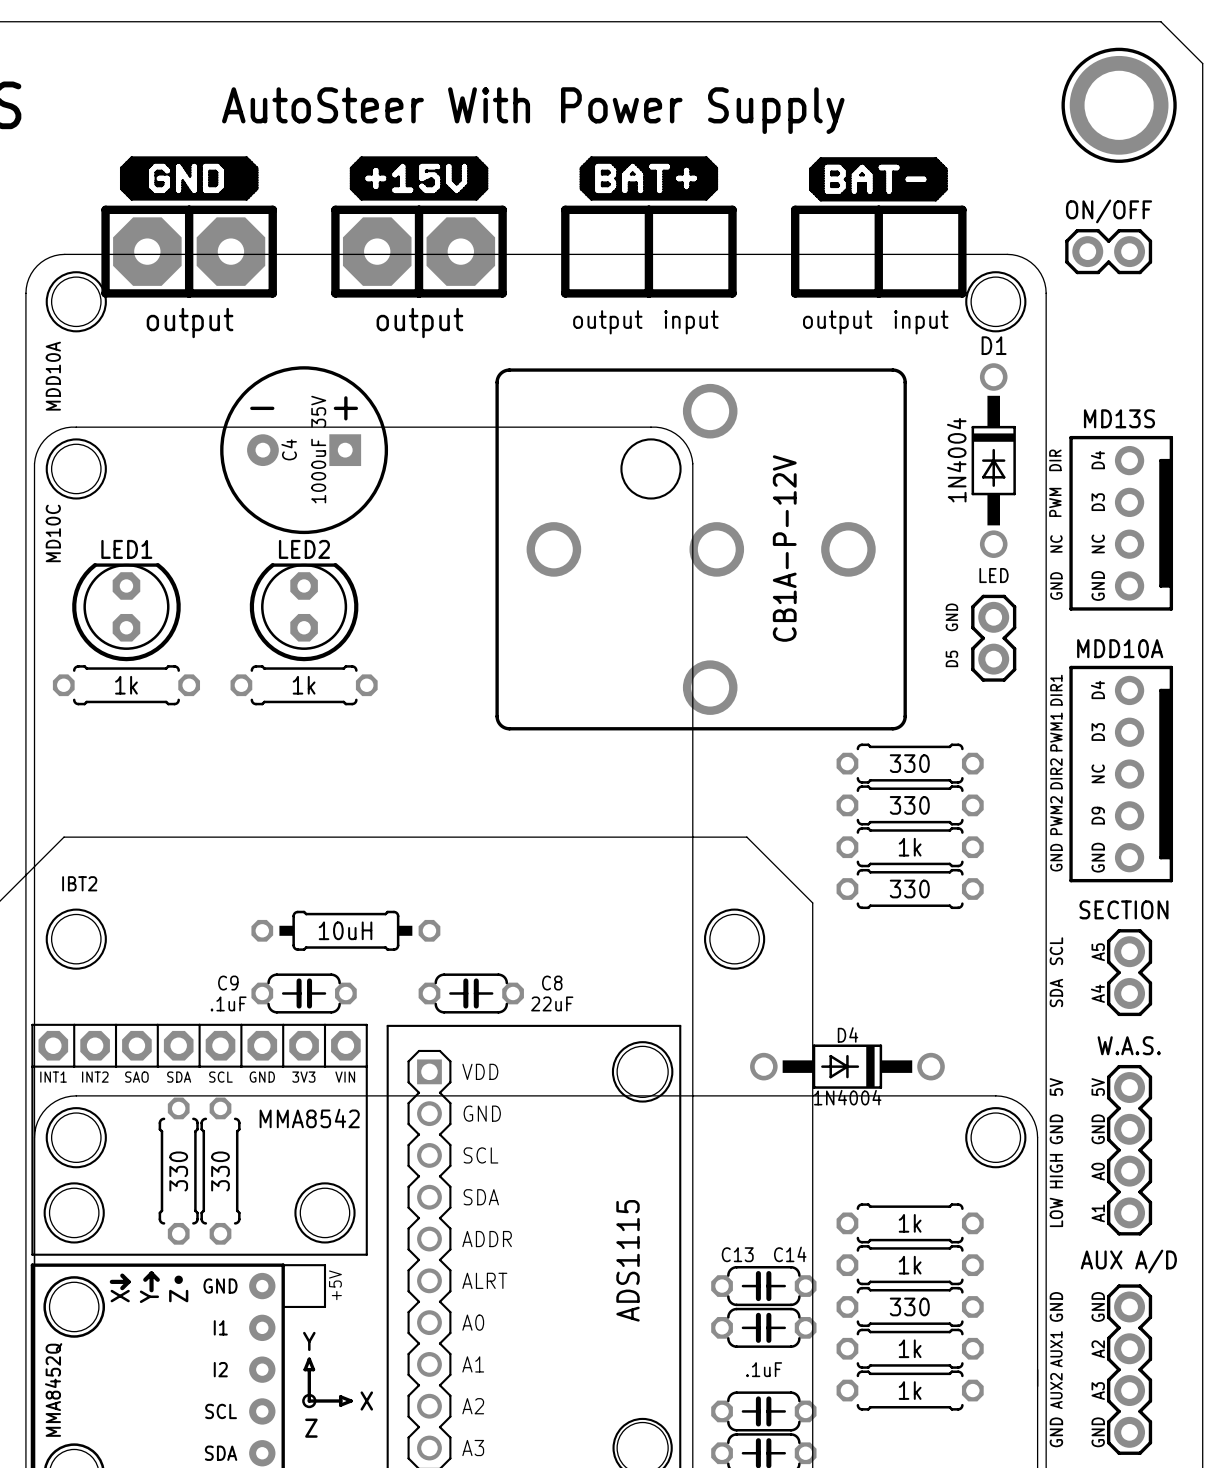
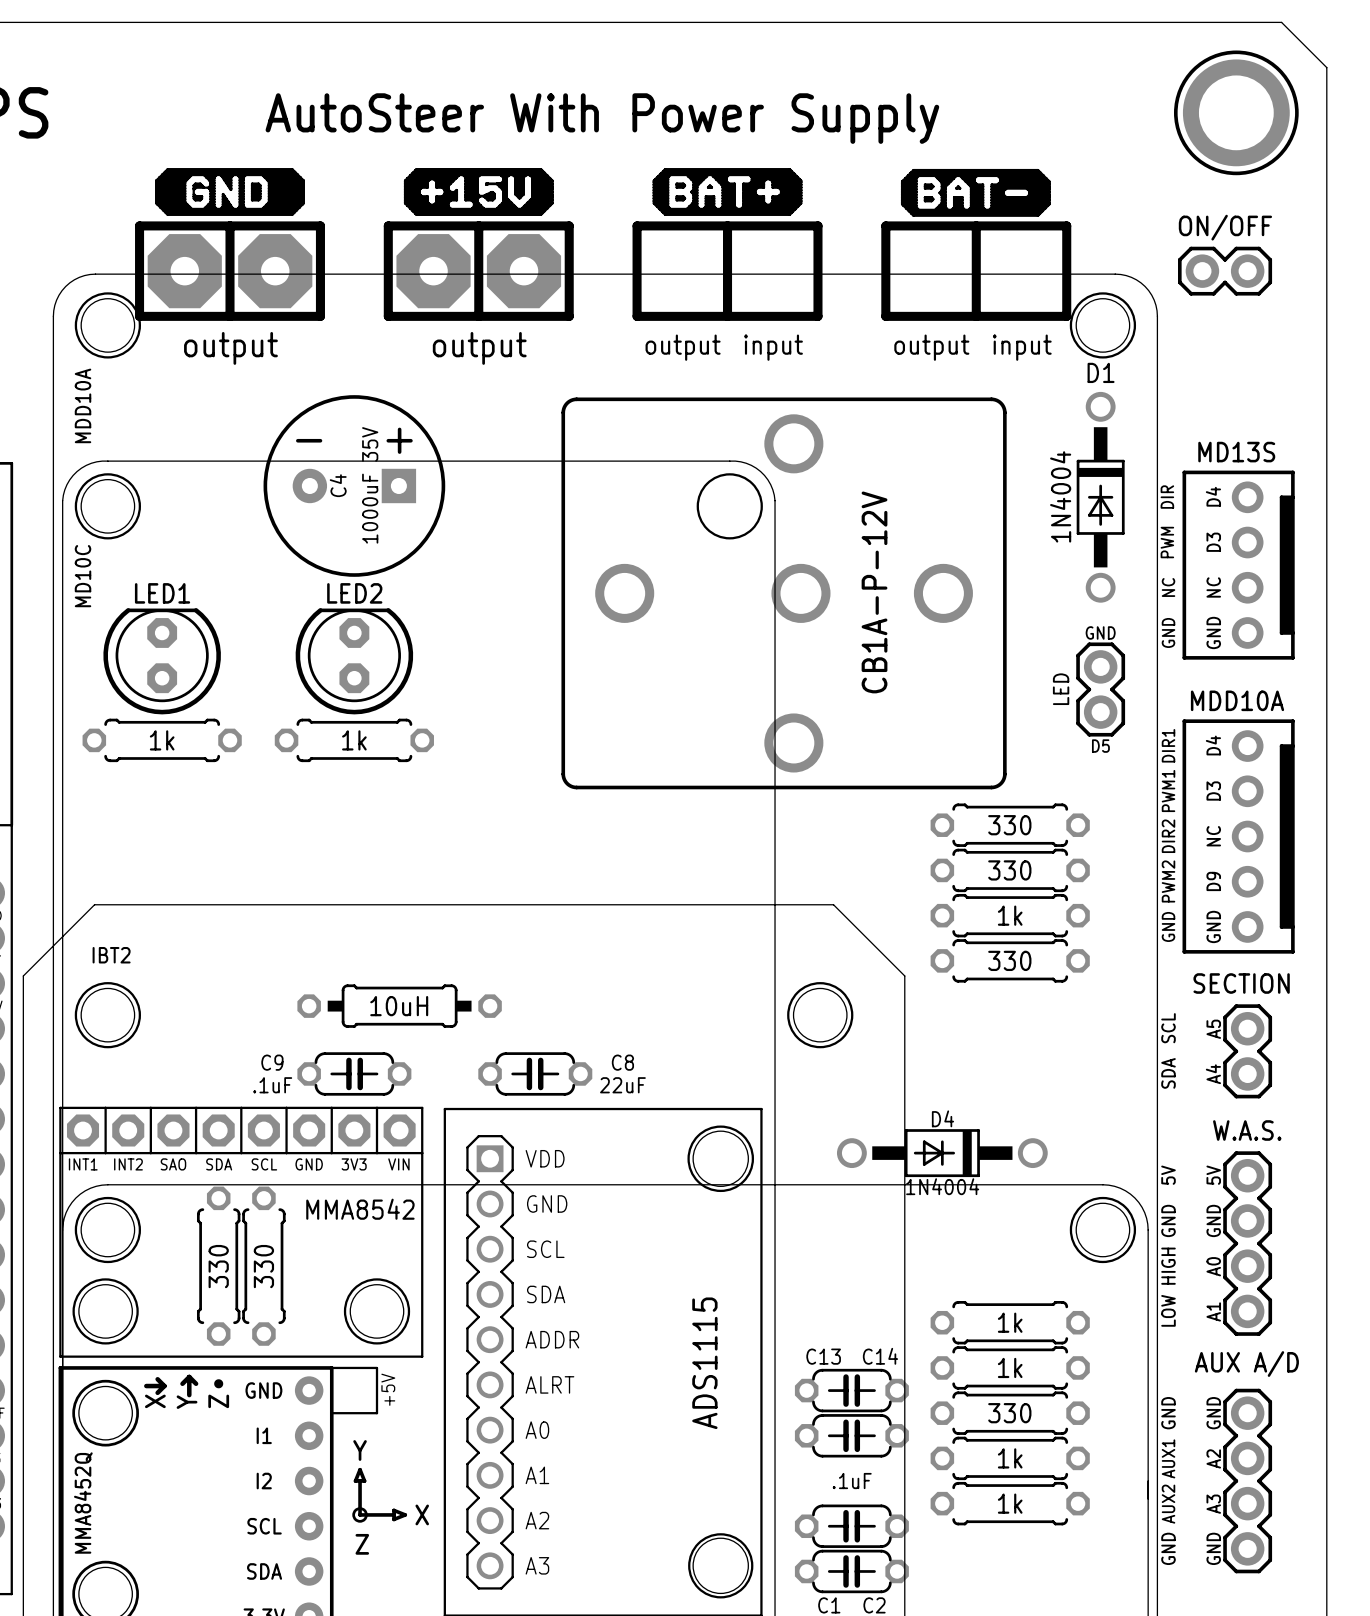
text: LED (994, 575) -> GND (1100, 632)
text: GND (951, 617) -> none
text: none -> LED (1061, 689)
D5 name rotation: 0° (951, 658) -> 90° clockwise (1100, 746)
D5 name position: D5 (951, 658) -> D5 (1100, 746)

